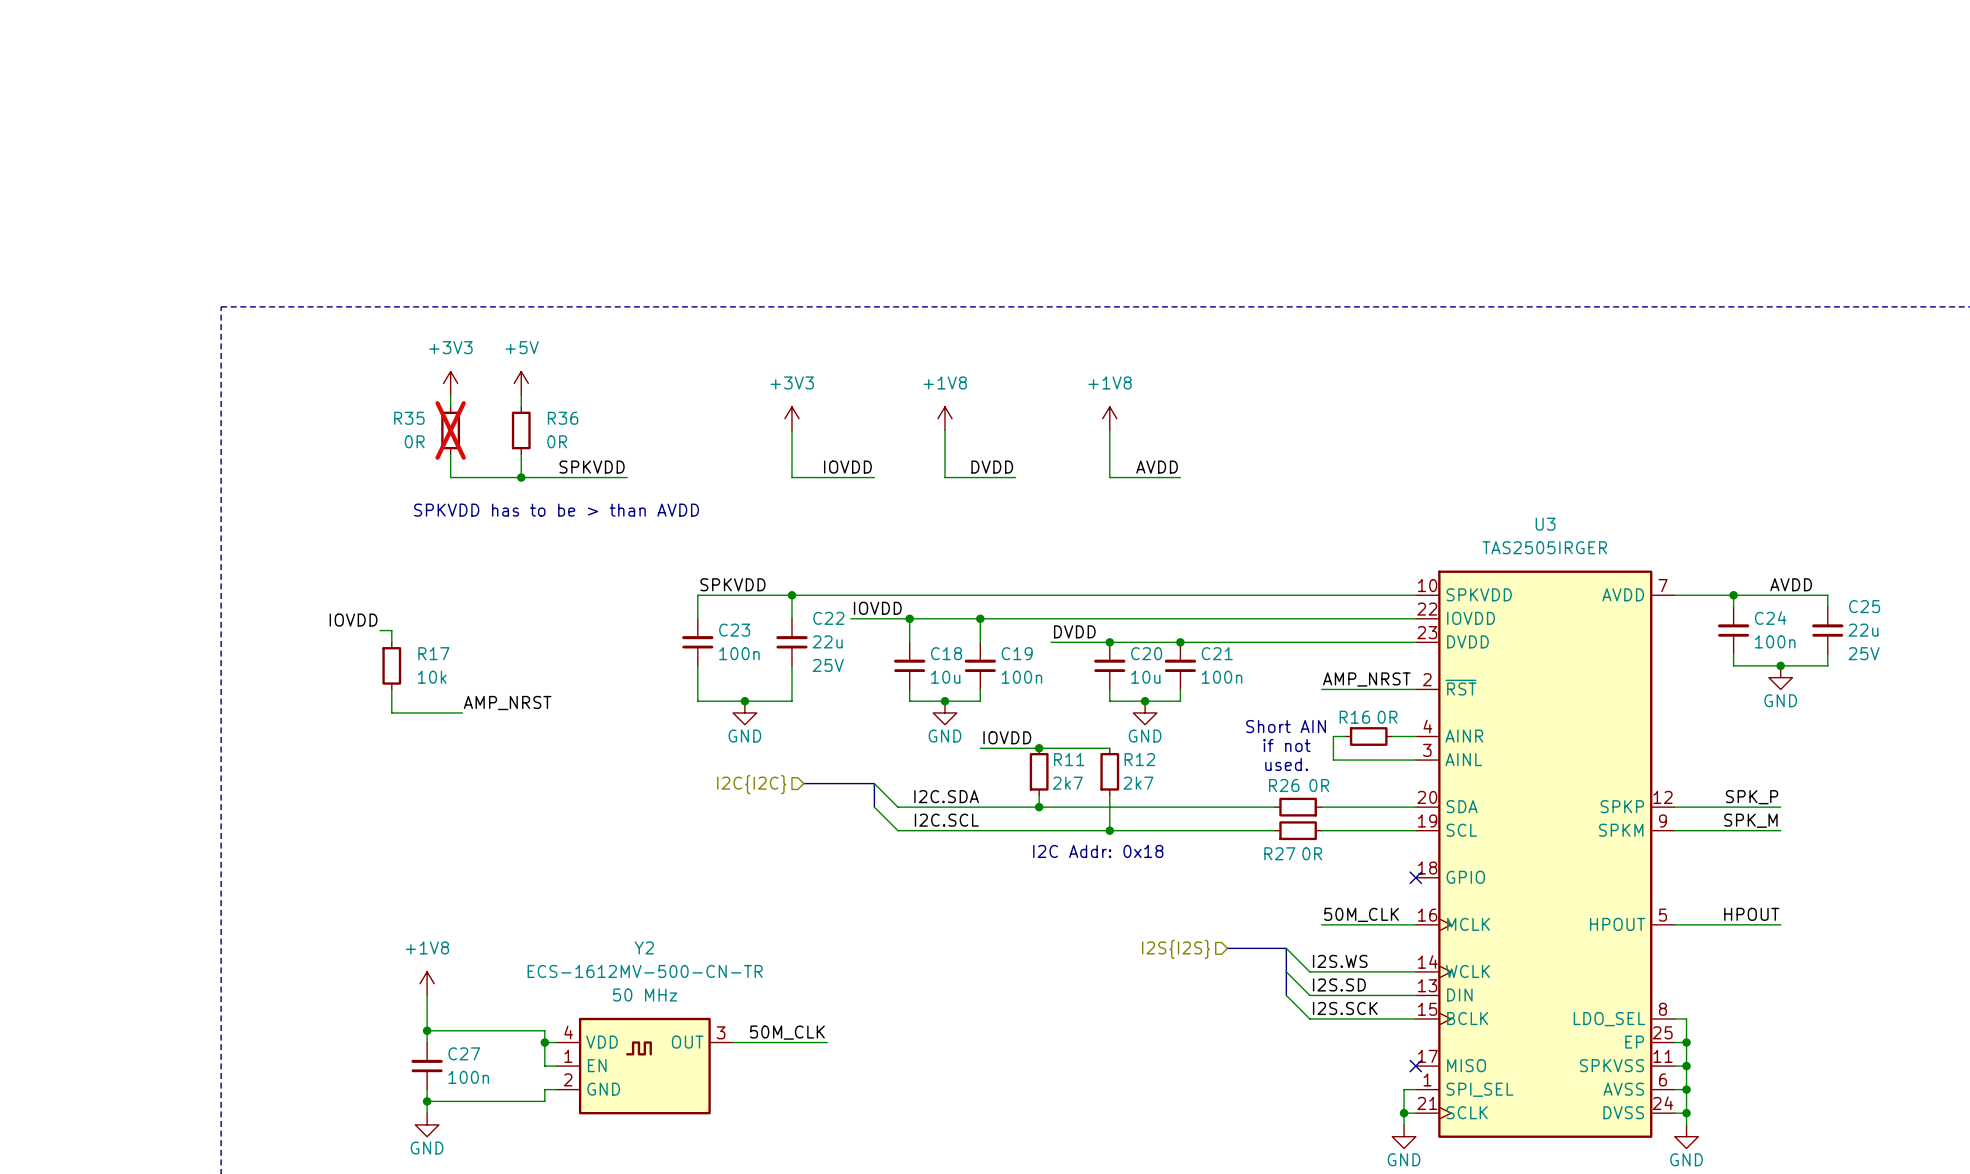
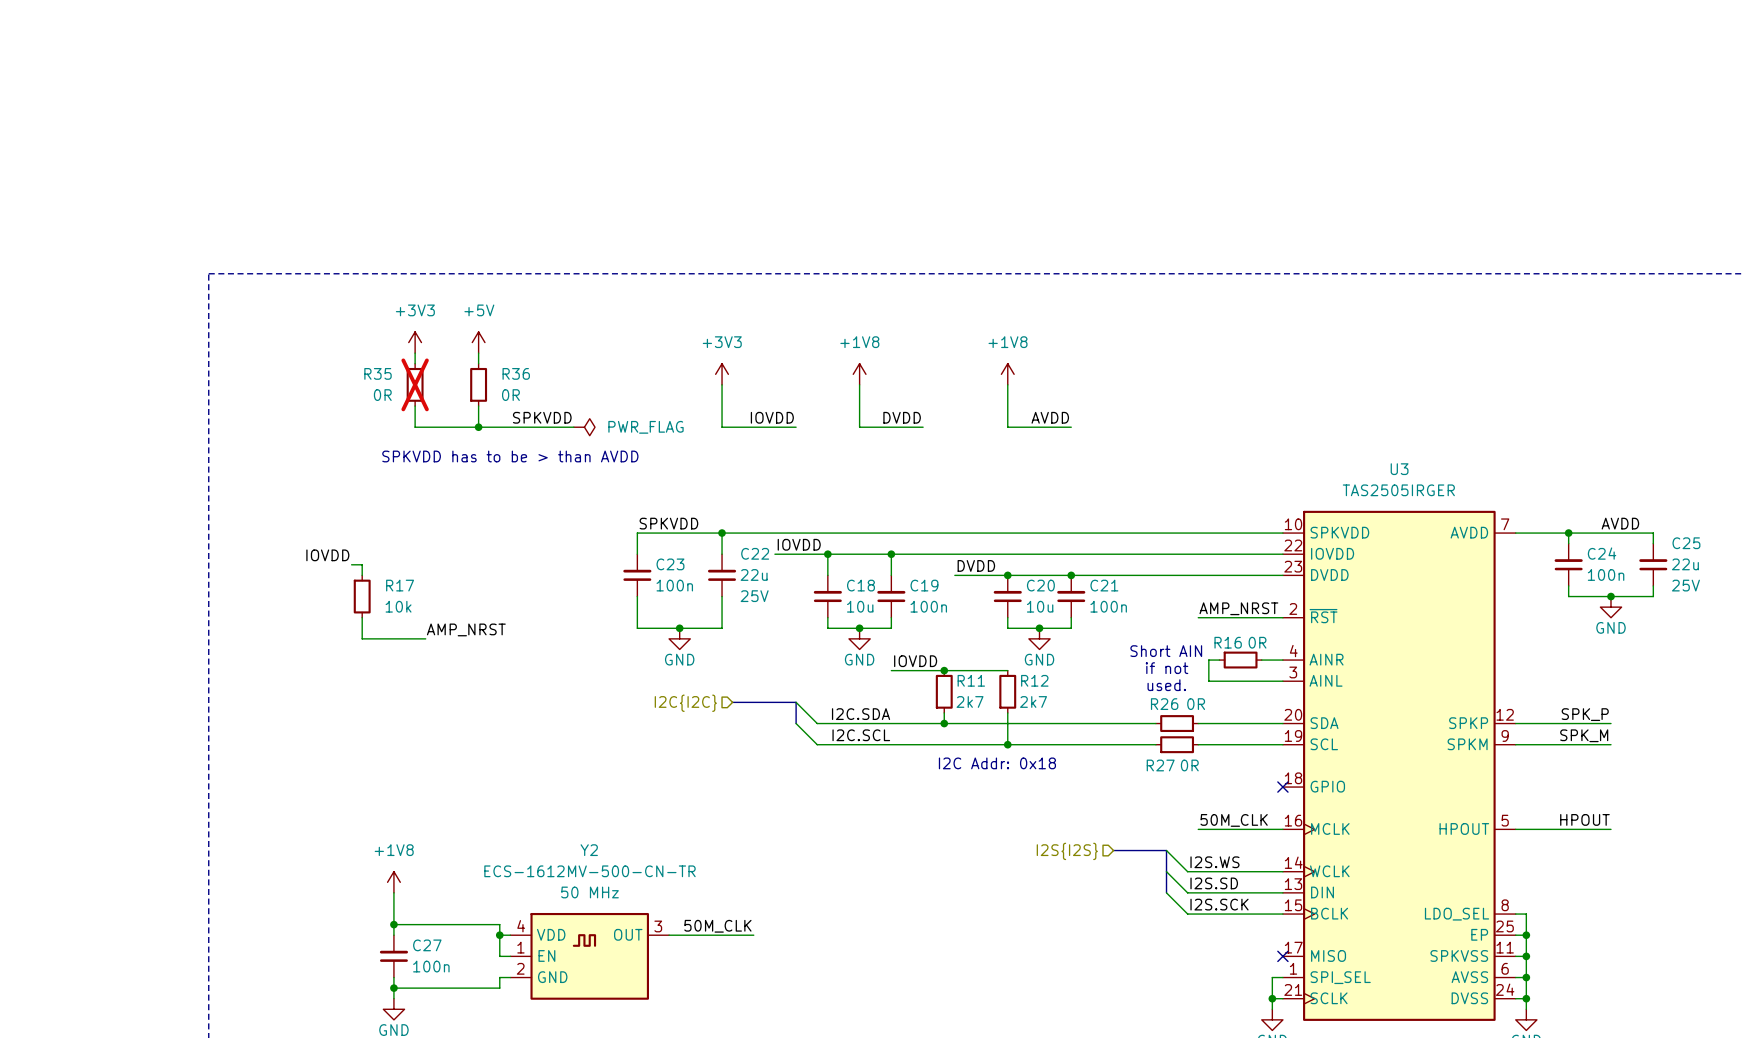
power symbol: none -> PWR_FLAG (584, 427)

